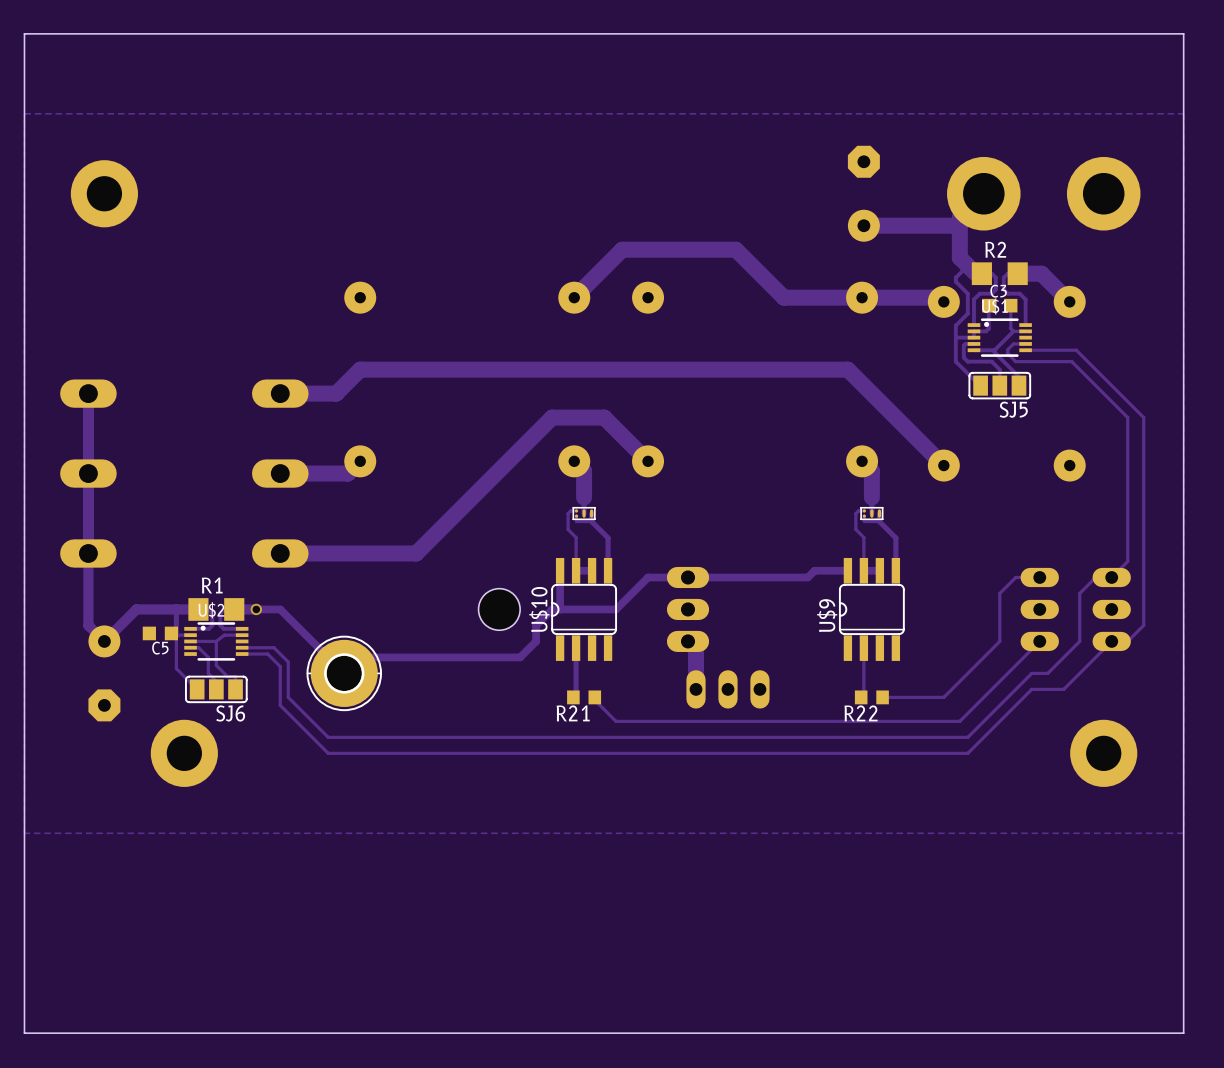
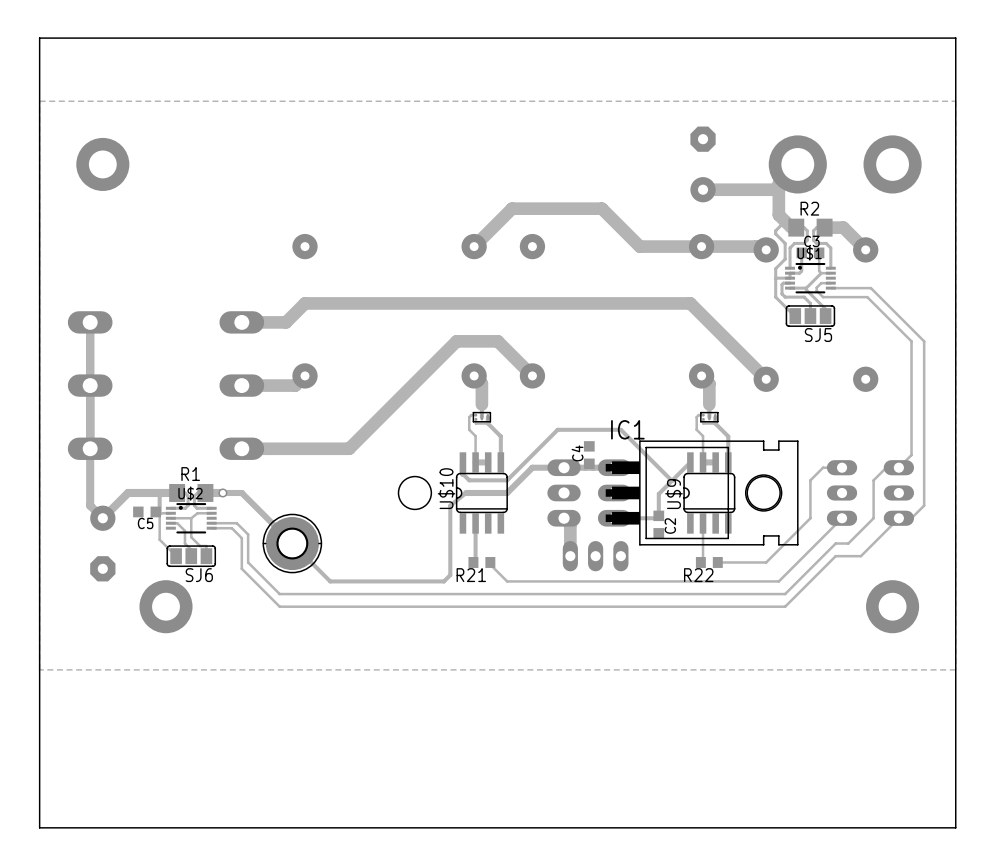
C4: none -> (589, 455)
track: (847, 570) (814, 570) (807, 577) (751, 577) -> (690, 462) (658, 493) (658, 515) (656, 518) (614, 518)
track: (560, 585) (560, 609) -> (462, 474) (469, 480) (507, 480) (557, 429) (620, 429) (671, 480)
track: (564, 609) (552, 609) (536, 625) (536, 641) (520, 657) (360, 657) (344, 673) -> (466, 492) (450, 505) (450, 575) (443, 581) (330, 581) (292, 543)
IC1: none -> (698, 492)
C2: none -> (658, 524)

